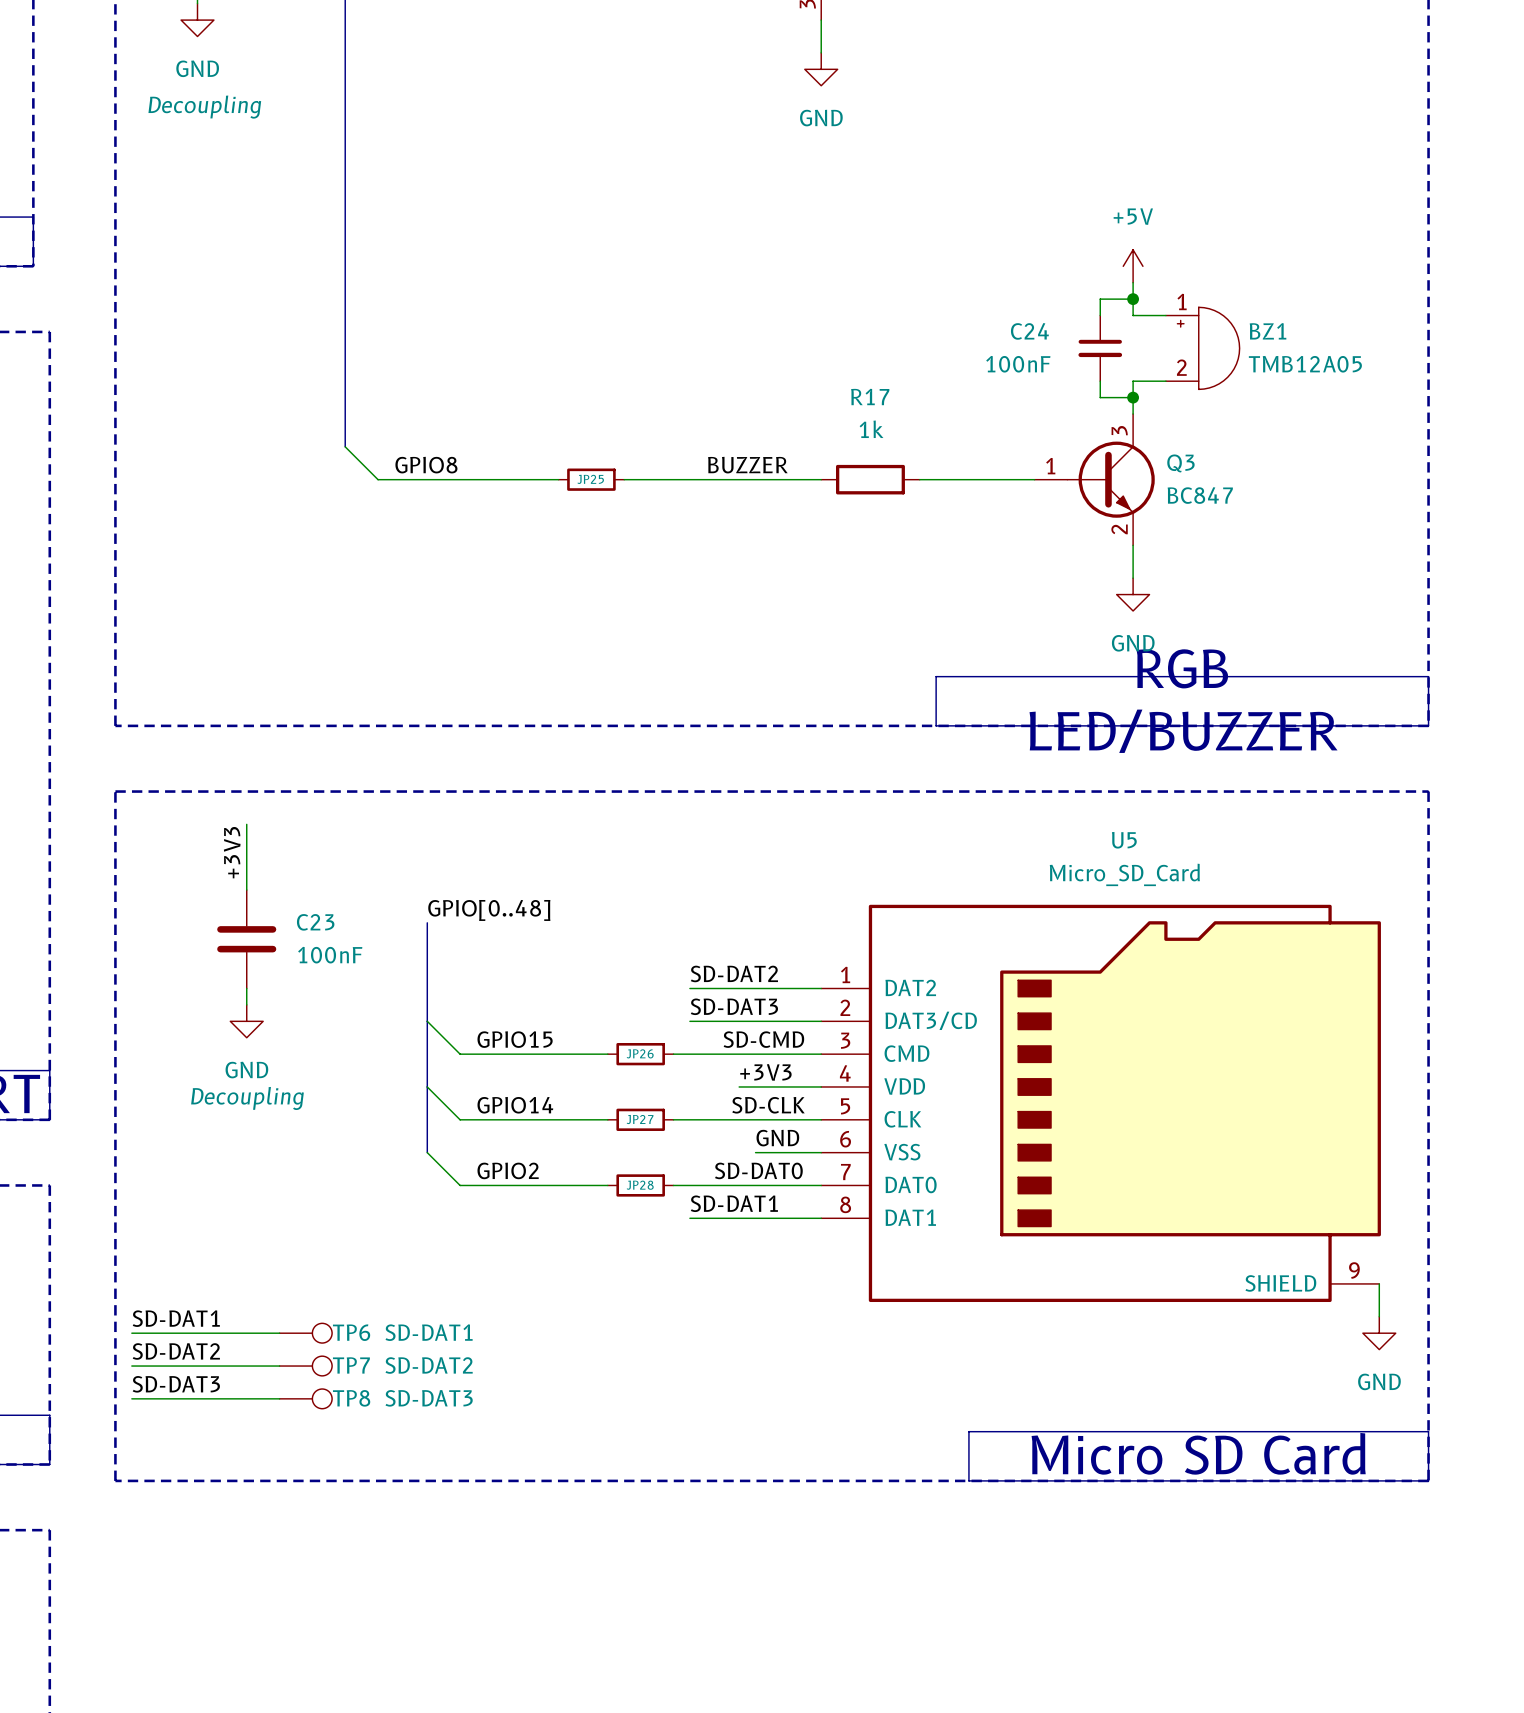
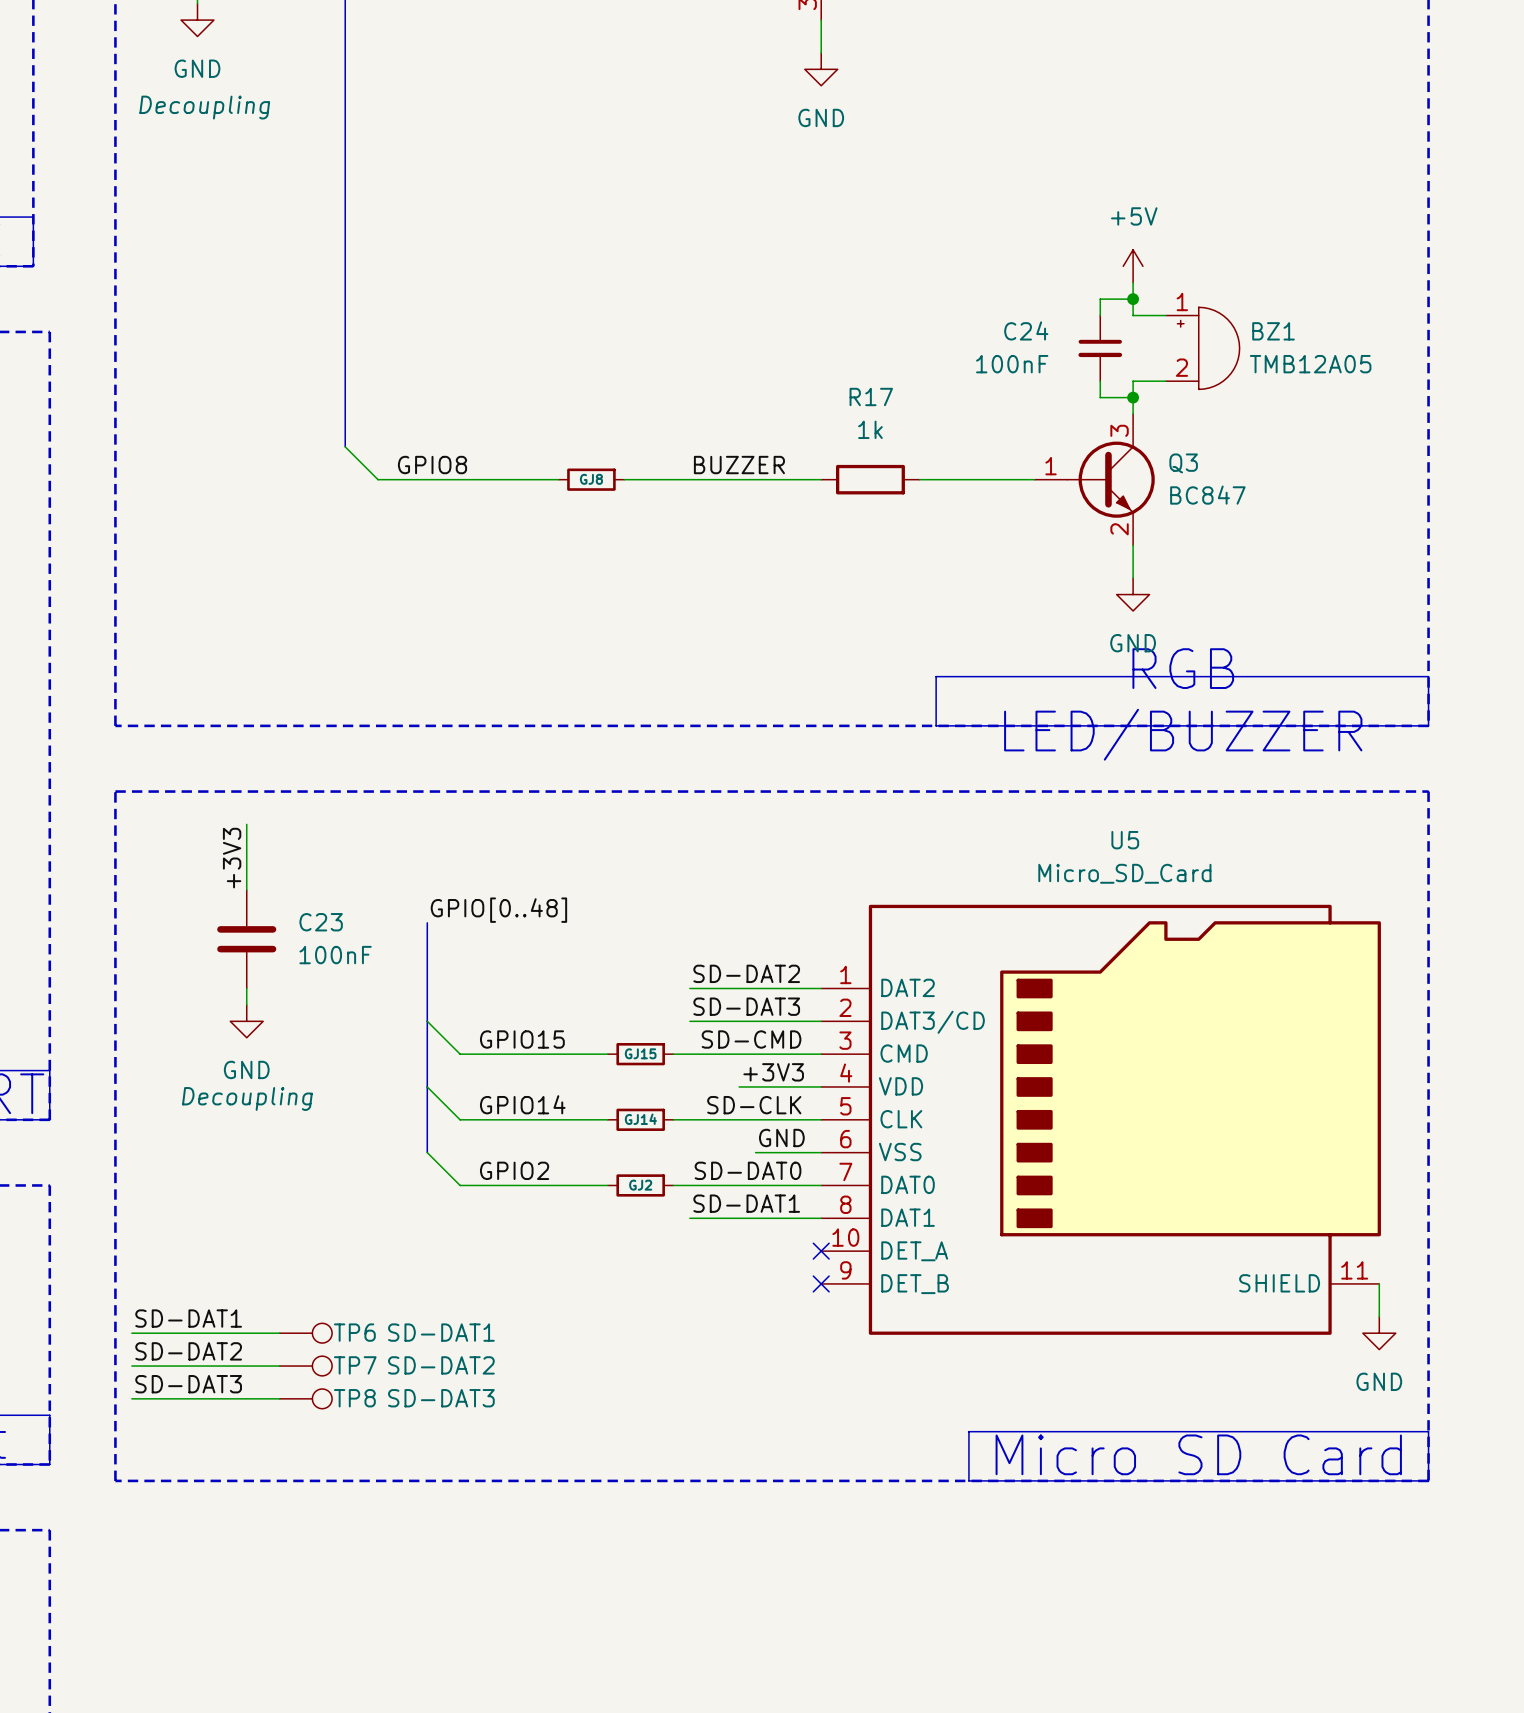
JP25 name: JP25 (590, 479) -> GJ8 (591, 479)
U5 symbol: [821, 904, 1381, 1303] -> [821, 904, 1381, 1335]
JP26 name: JP26 (640, 1053) -> GJ15 (640, 1053)
JP27 name: JP27 (640, 1119) -> GJ14 (640, 1119)
JP28 name: JP28 (640, 1185) -> GJ2 (640, 1185)
no-connect mark: none -> (821, 1251)
no-connect mark: none -> (821, 1283)

